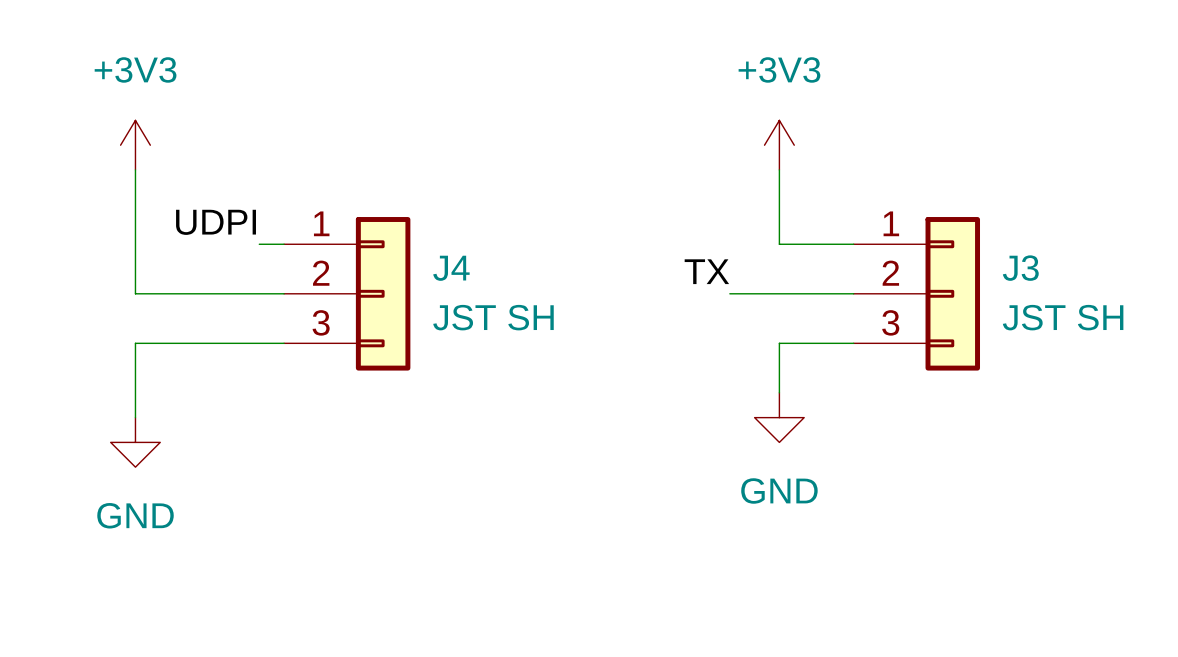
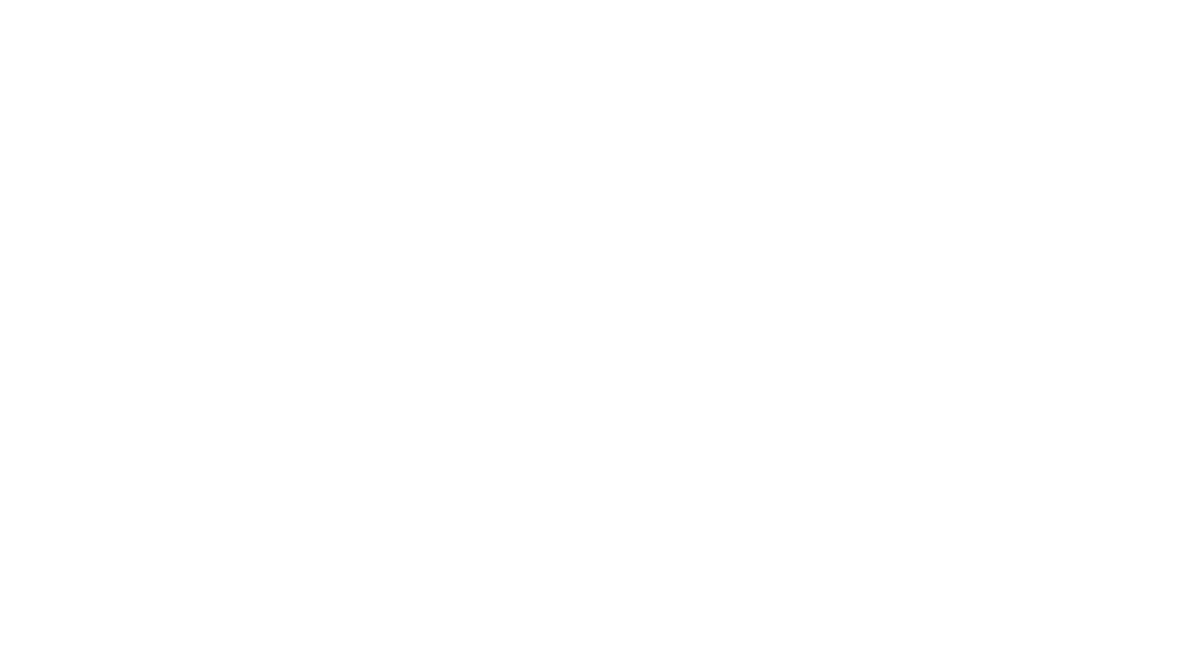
power symbol: +3V3 (135, 145) -> none
power symbol: +3V3 (779, 145) -> none
wire: (135, 169) (135, 293) (284, 293) -> none
wire: (779, 169) (779, 244) (853, 244) -> none
label: UDPI (216, 222) -> none
wire: (259, 244) (284, 244) -> none
label: TX (706, 271) -> none
J4: JST SH (347, 293) -> none
wire: (729, 293) (853, 293) -> none
J3: JST SH (916, 293) -> none
wire: (284, 343) (135, 343) (135, 417) -> none
wire: (853, 343) (779, 343) (779, 392) -> none
power symbol: GND (779, 417) -> none
power symbol: GND (135, 442) -> none

